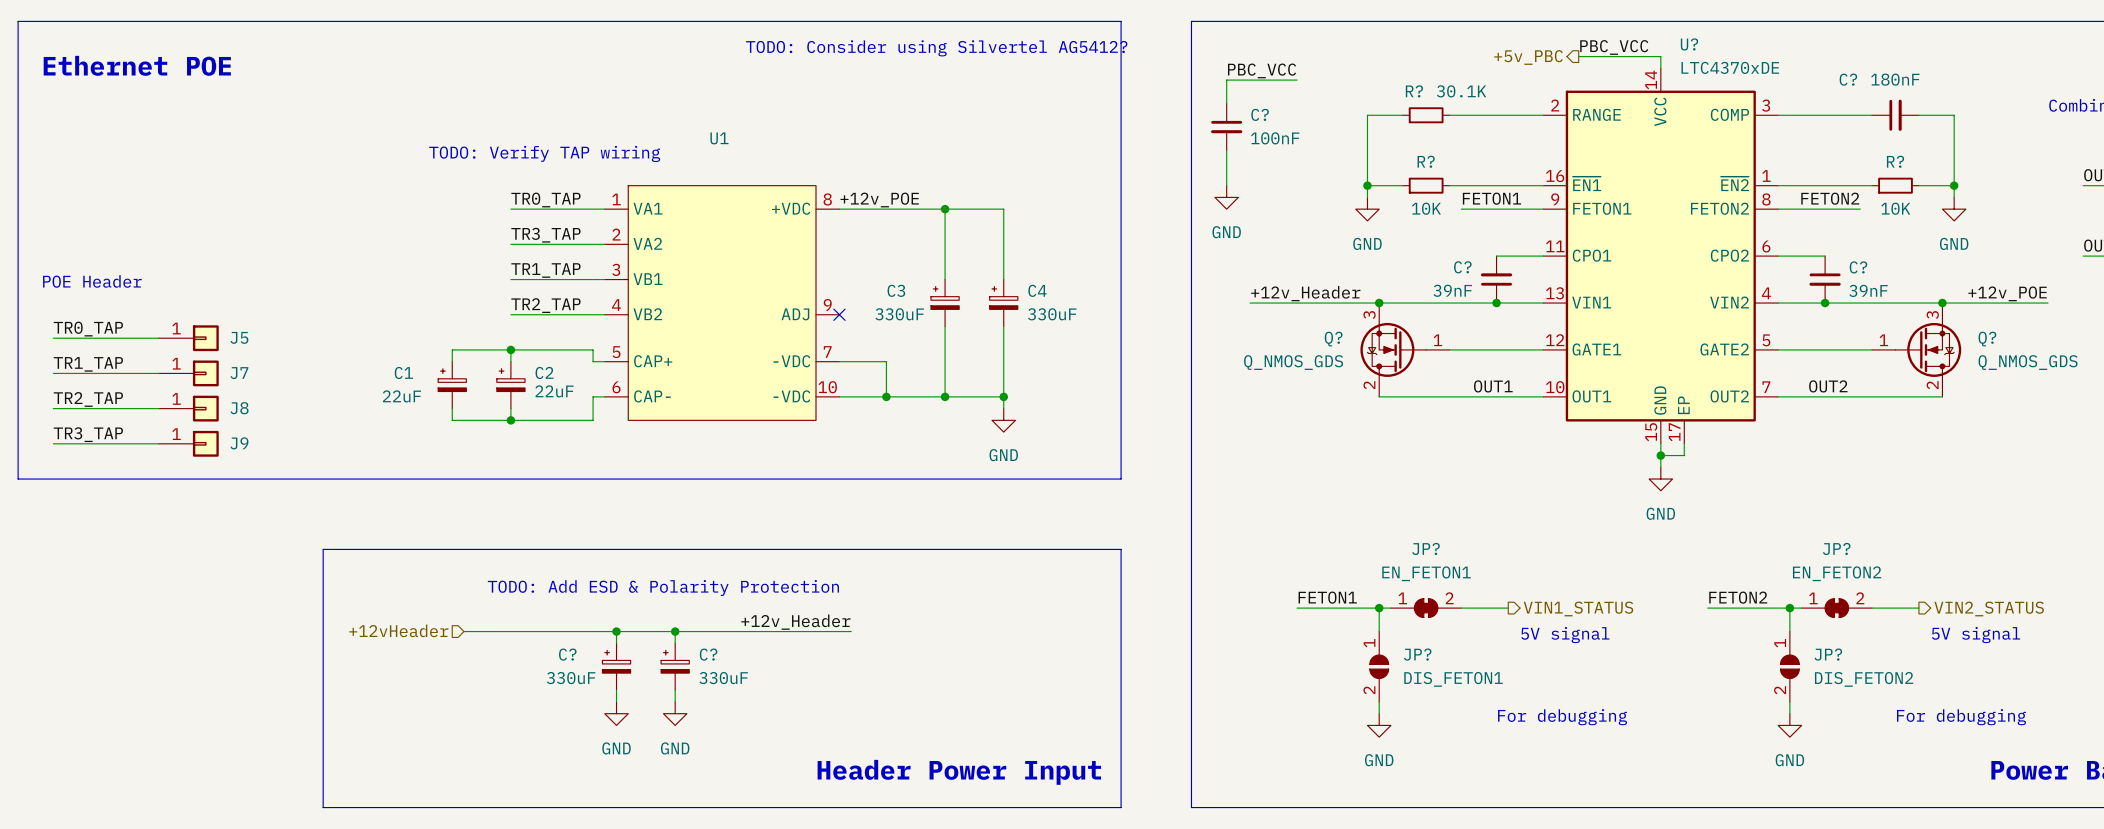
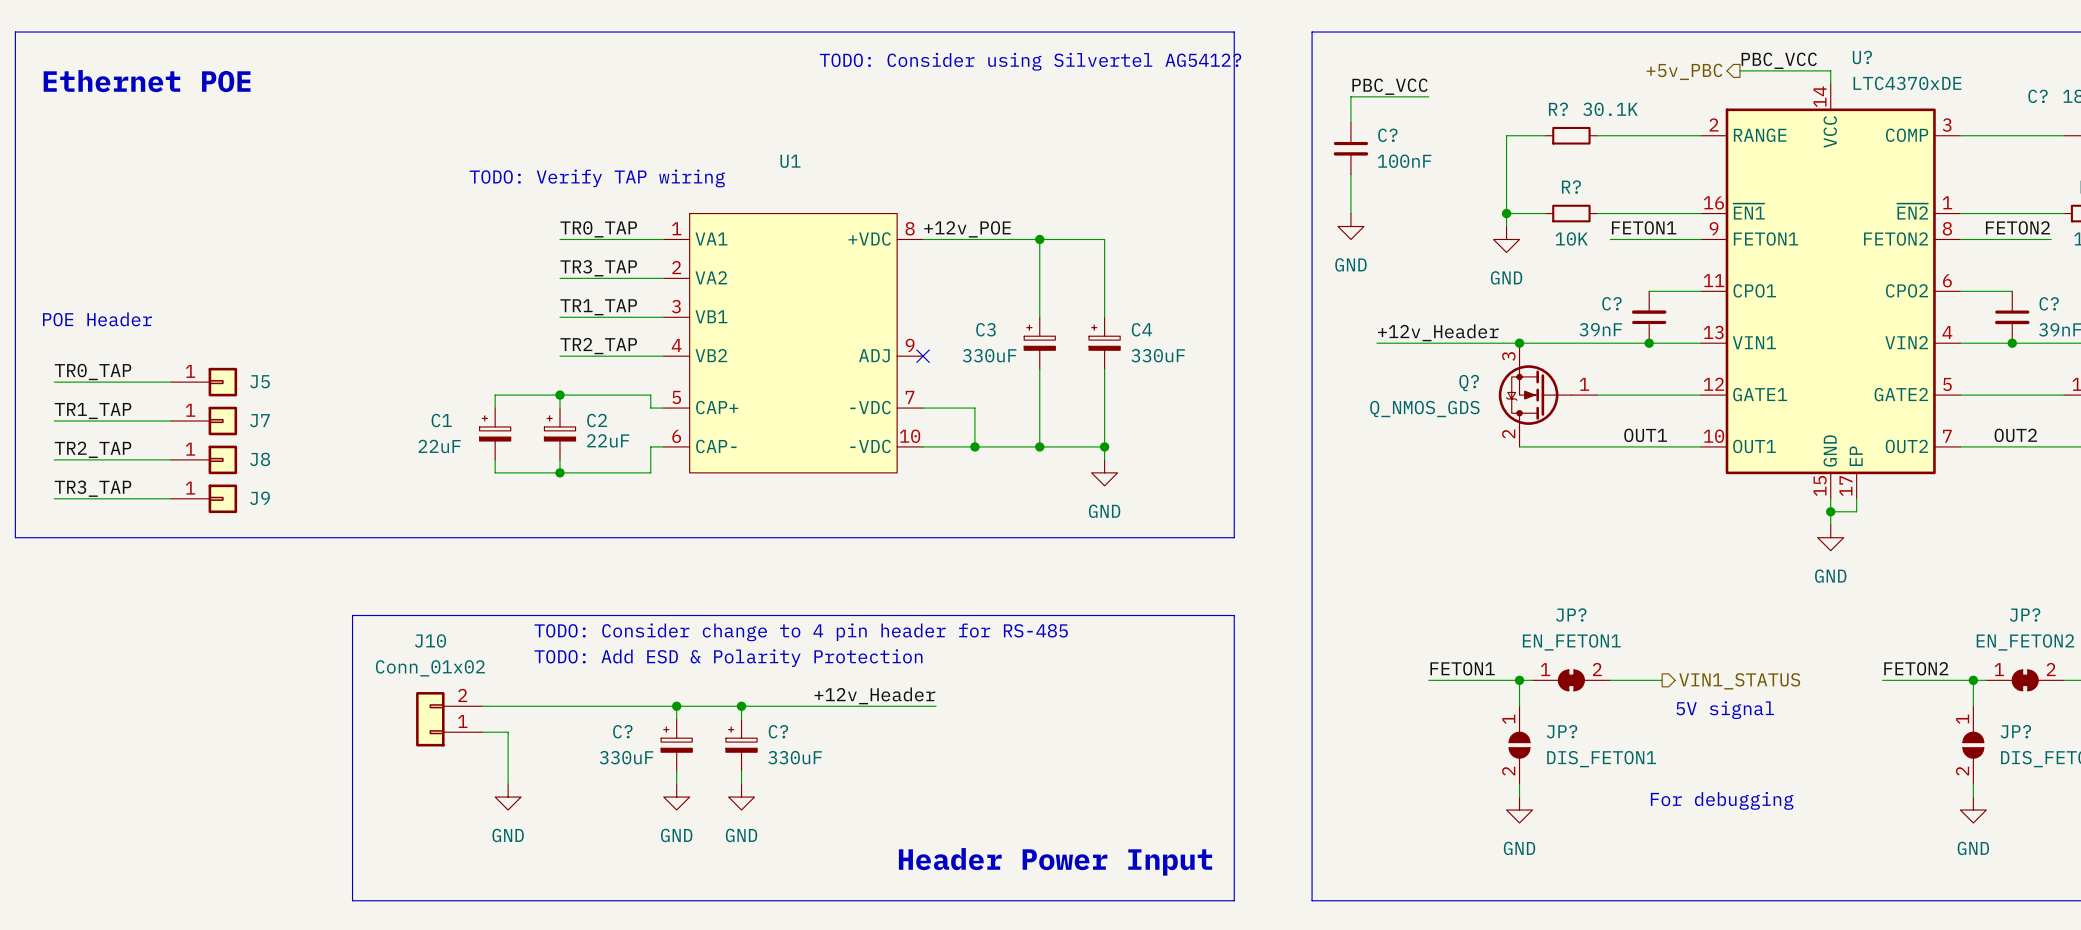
text: none -> TODO: Consider change to 4 pin header for RS-485 (801, 632)
hierarchical label: +12vHeader (398, 630) -> none
wire: none -> (482, 706) (508, 706)
J10: none -> Conn_01x02 (449, 719)
wire: none -> (482, 732) (508, 732) (508, 784)
power symbol: none -> GND (508, 797)

